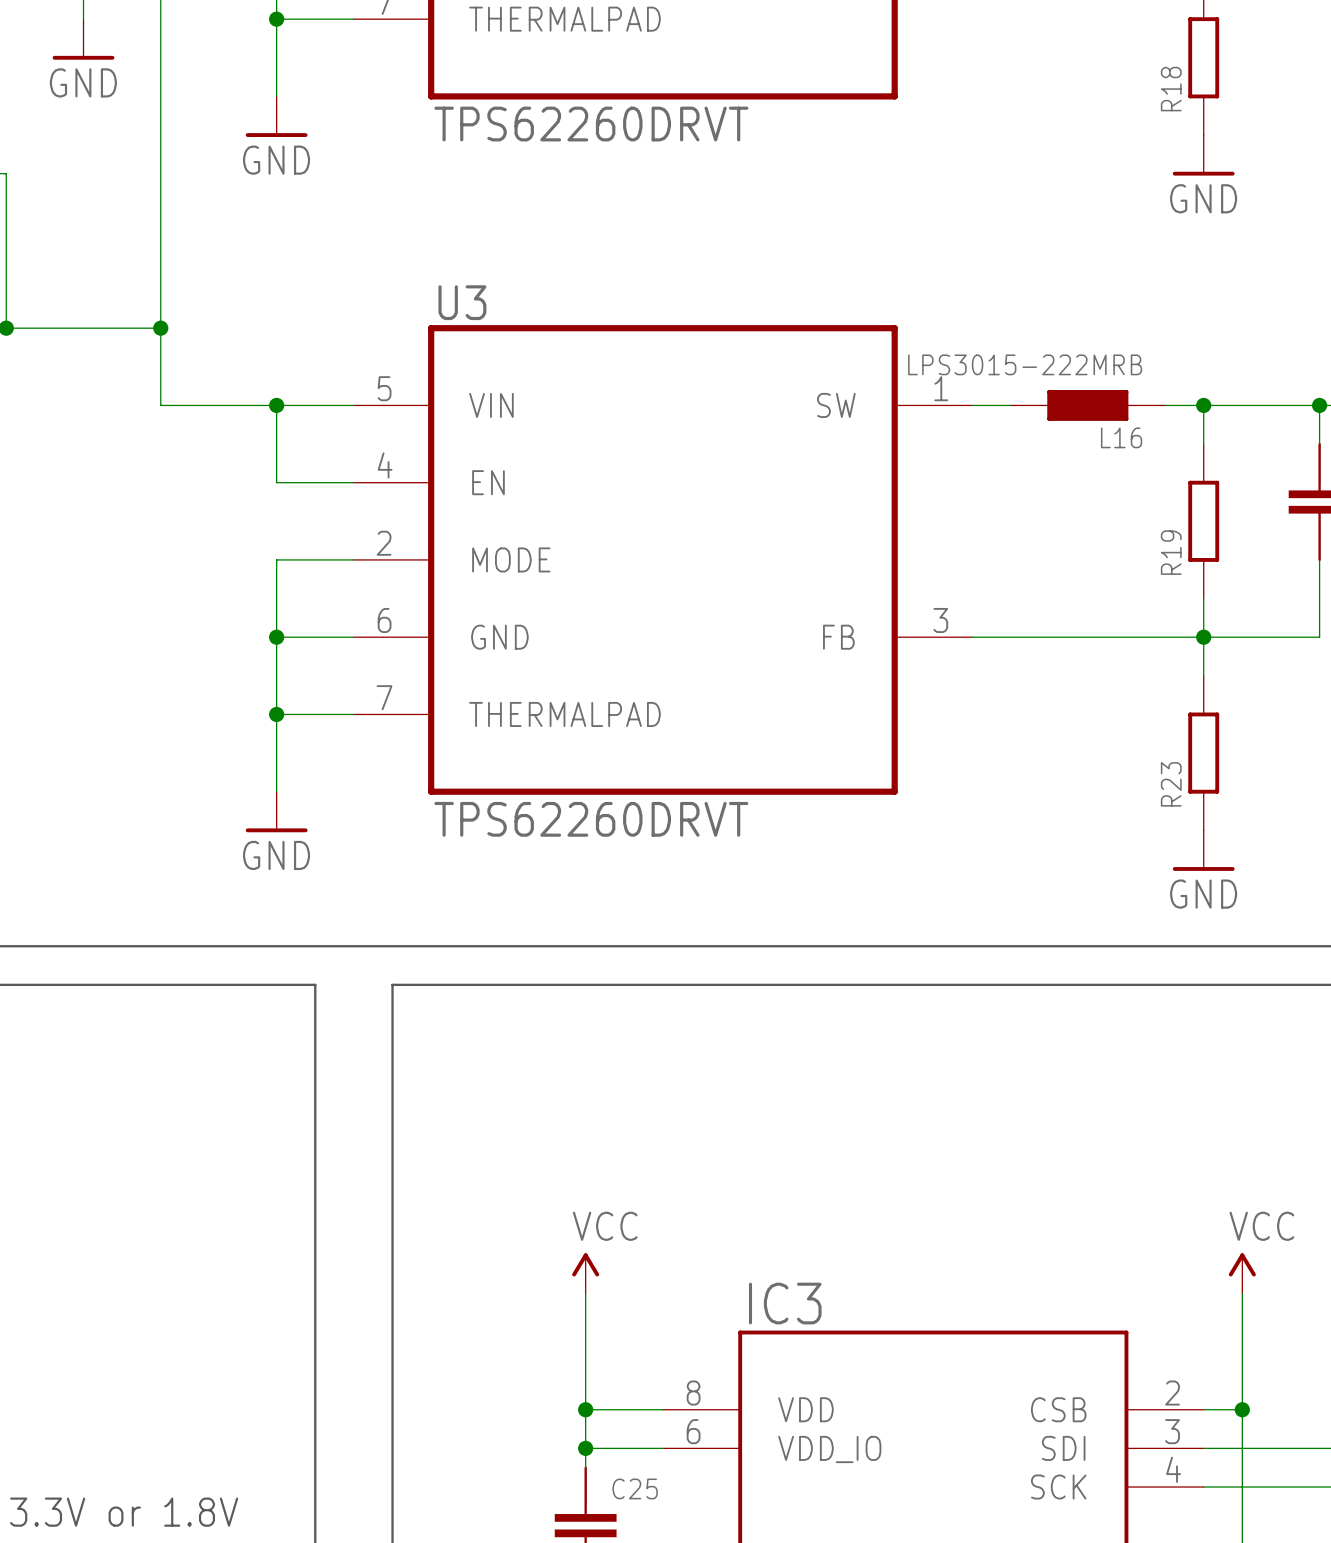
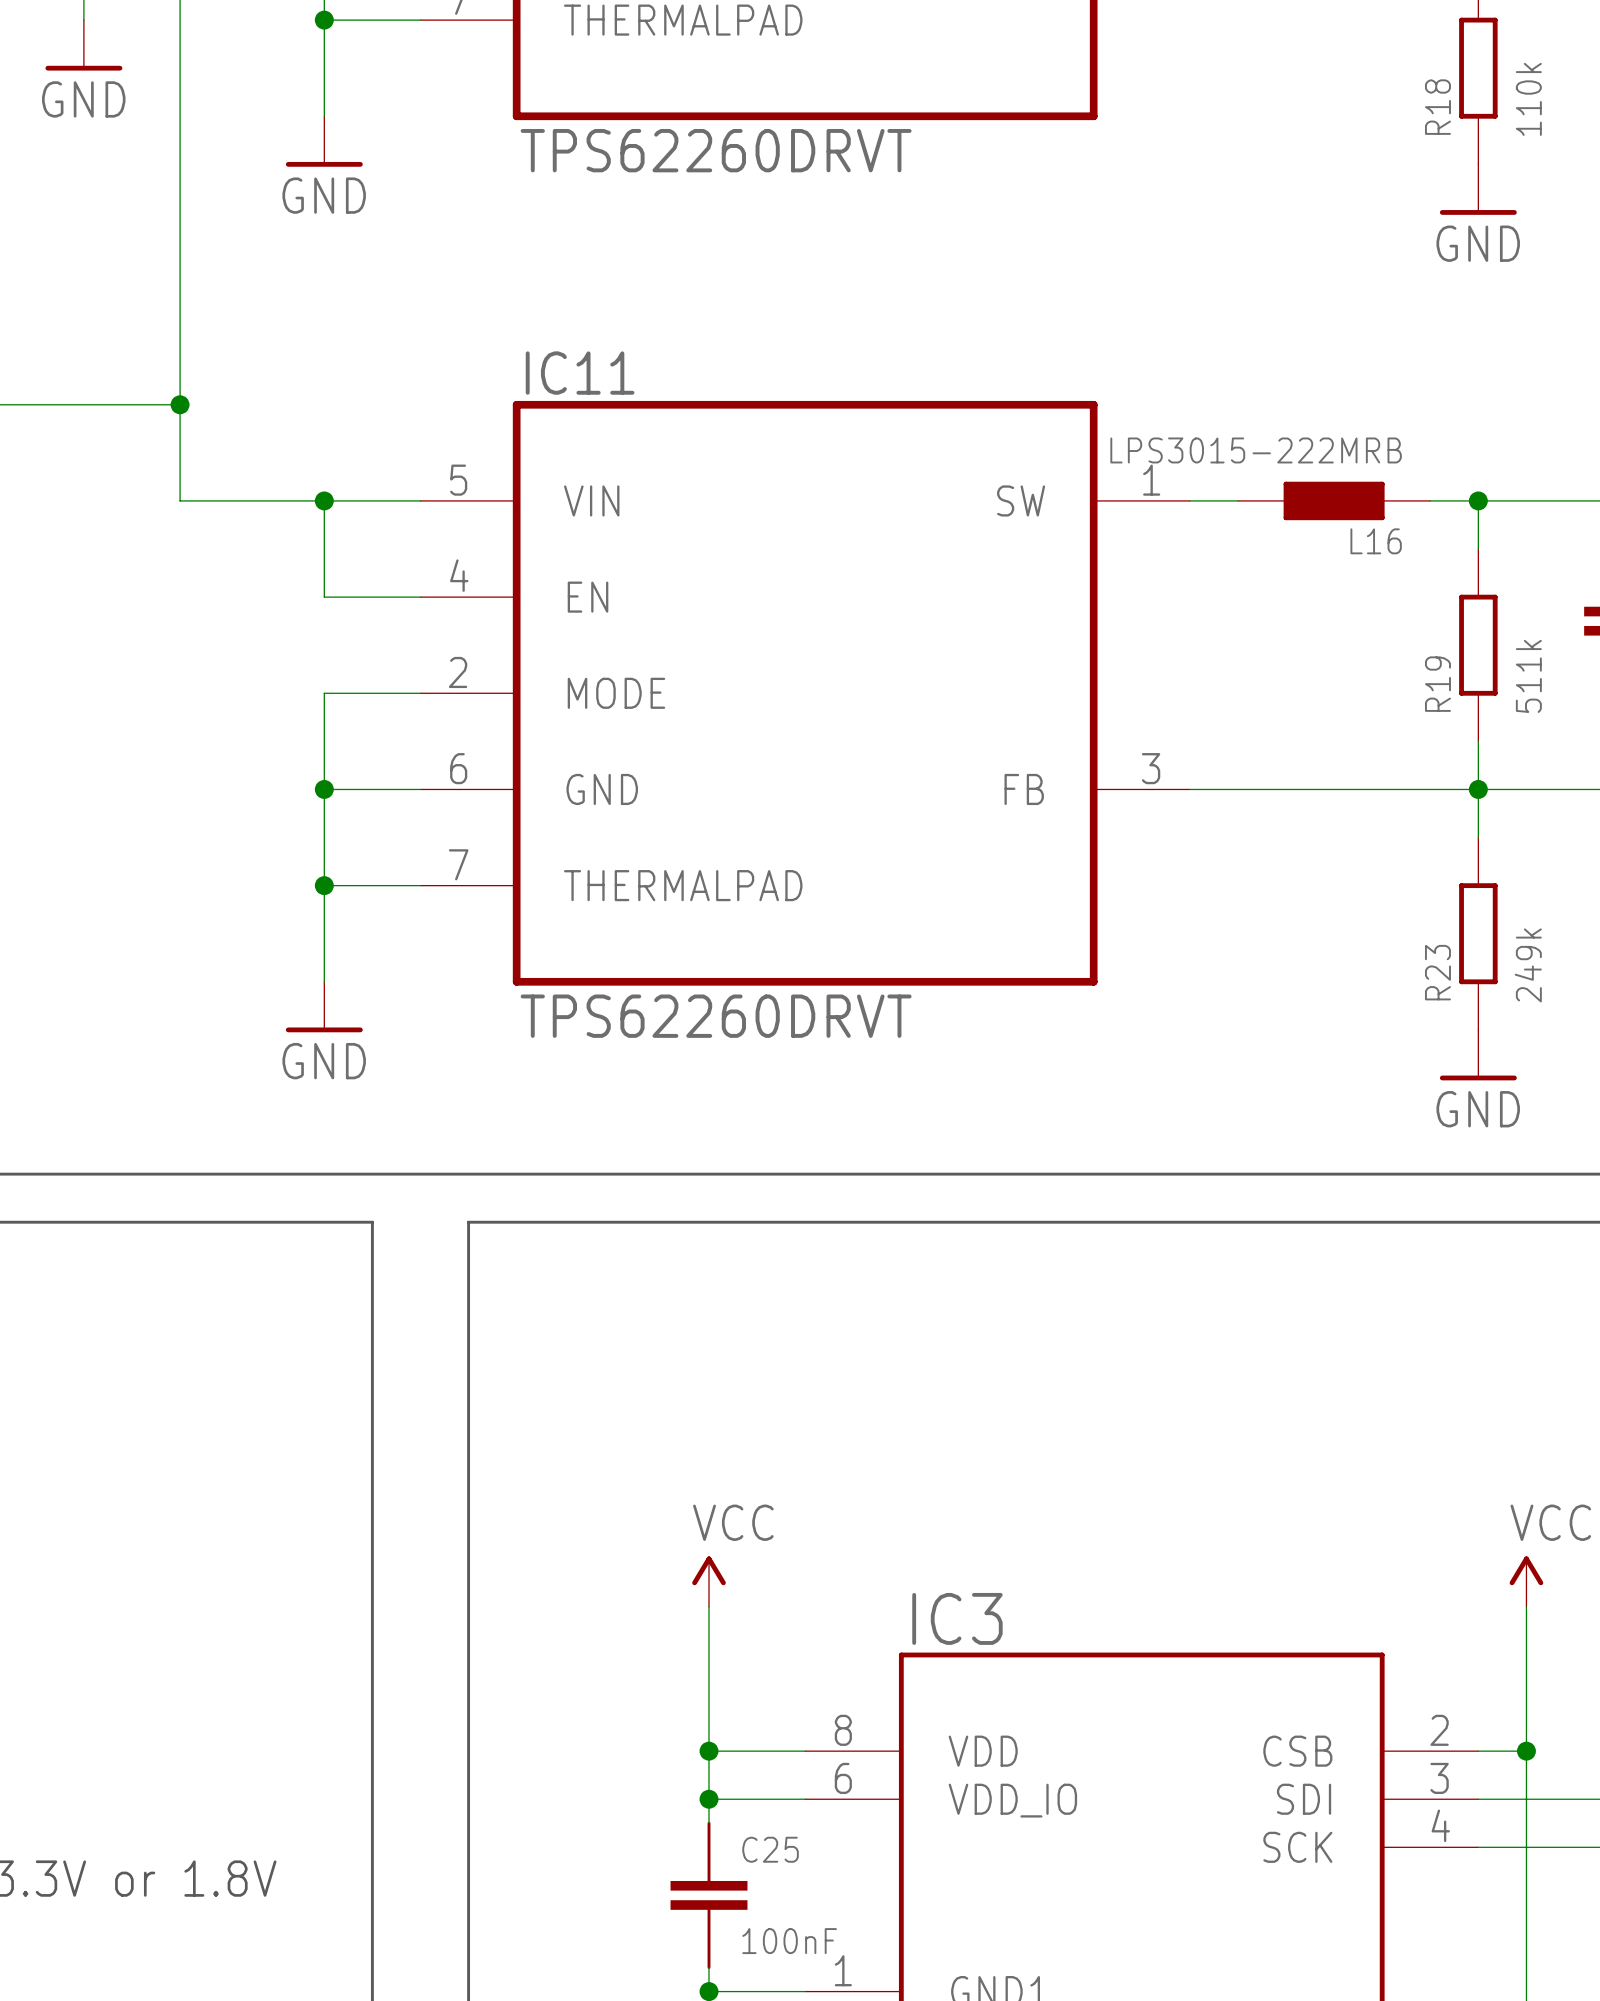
R18 value: none -> 110k (1528, 99)
U3 name: U3 (462, 302) -> IC11 (580, 373)
R19 value: none -> 511k (1528, 676)
R23 value: none -> 249k (1528, 965)

